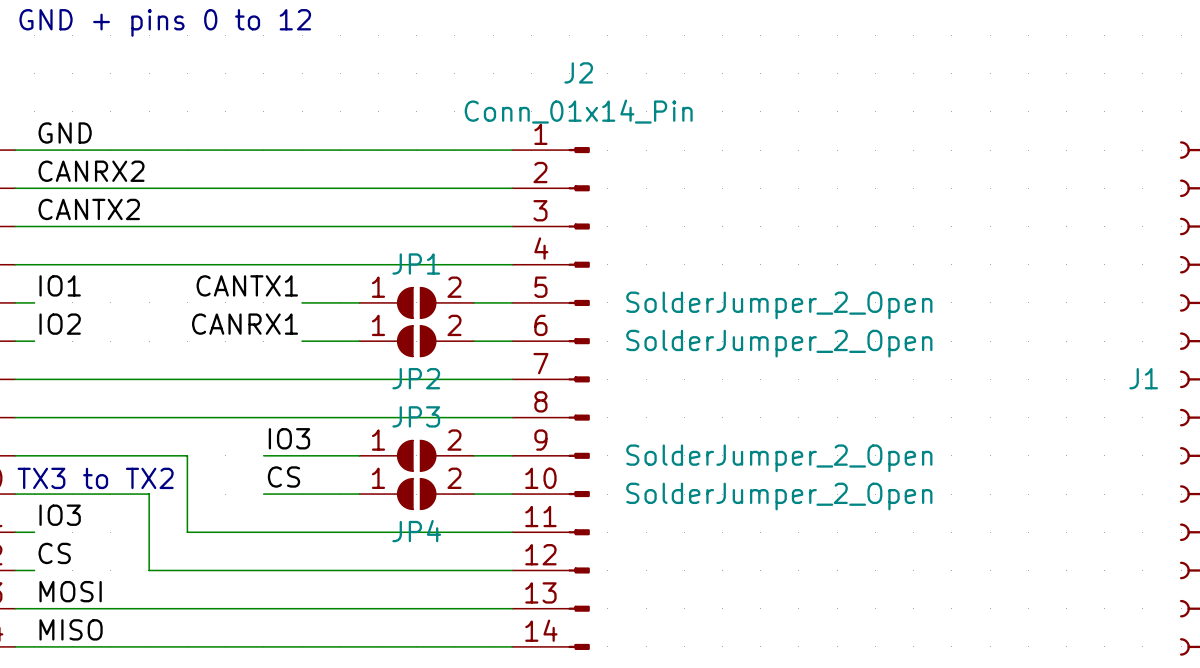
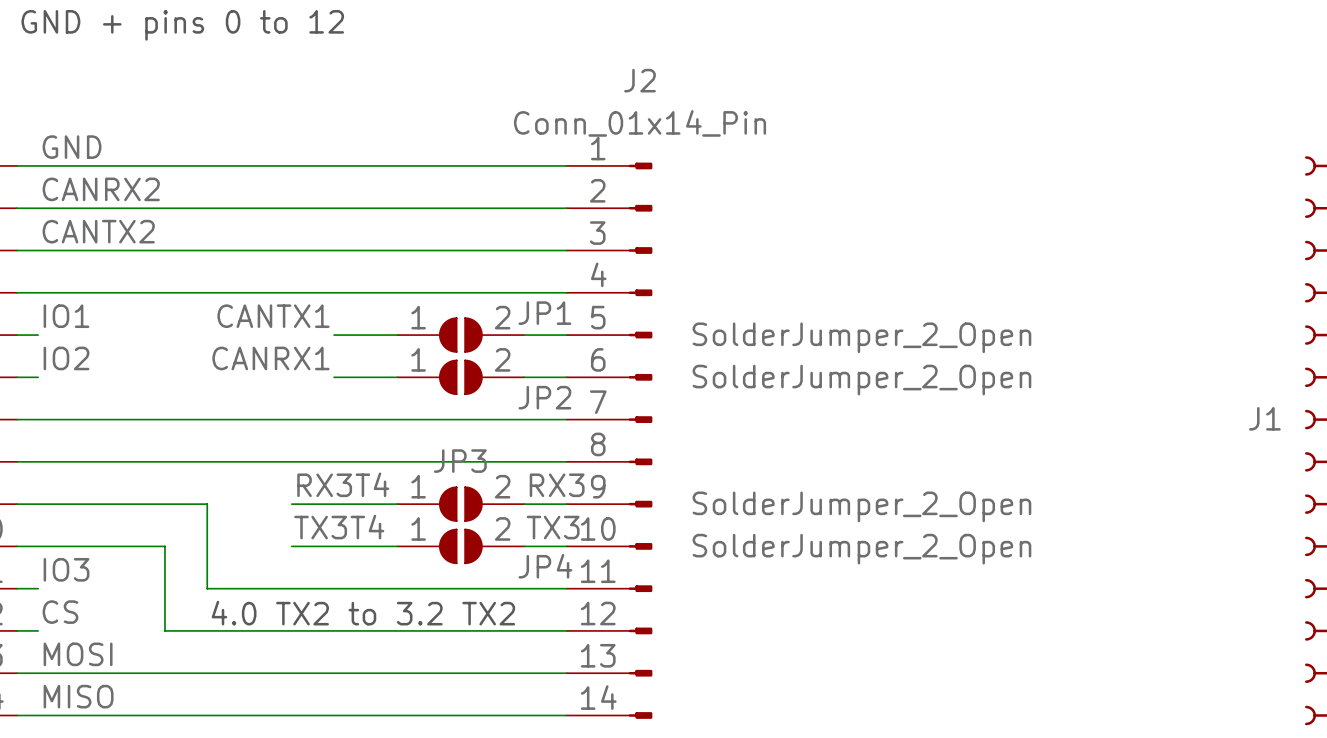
JP1 name position: JP1 (416, 264) -> JP1 (544, 313)
JP2 name position: JP2 (416, 378) -> JP2 (544, 397)
label: IO3 (289, 438) -> RX3T4 (343, 484)
label: none -> RX3 (557, 485)
label: CS (283, 476) -> TX3T4 (339, 527)
label: none -> TX3 (553, 527)
text: TX3 to TX2 (95, 478) -> none
JP4 name position: JP4 (416, 531) -> JP4 (545, 566)
text: none -> 4.0 TX2 to 3.2 TX2 (363, 613)

